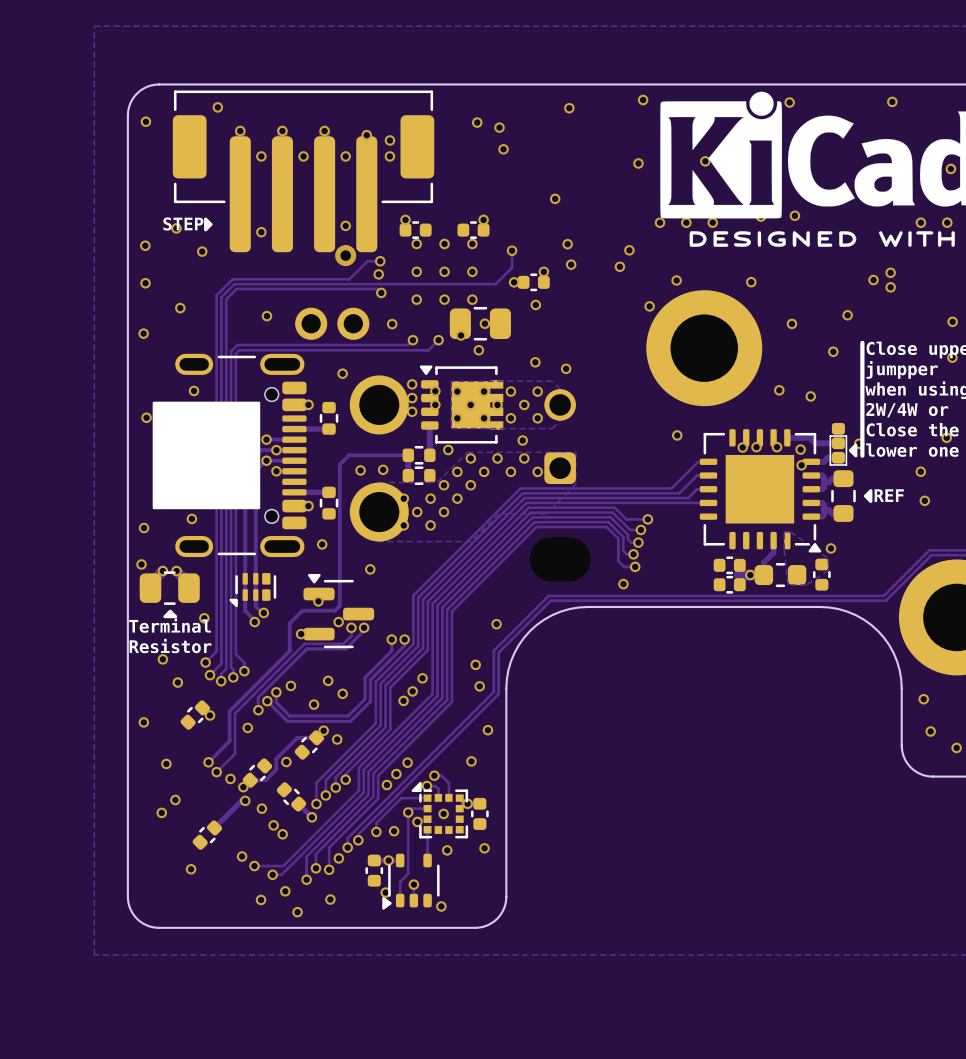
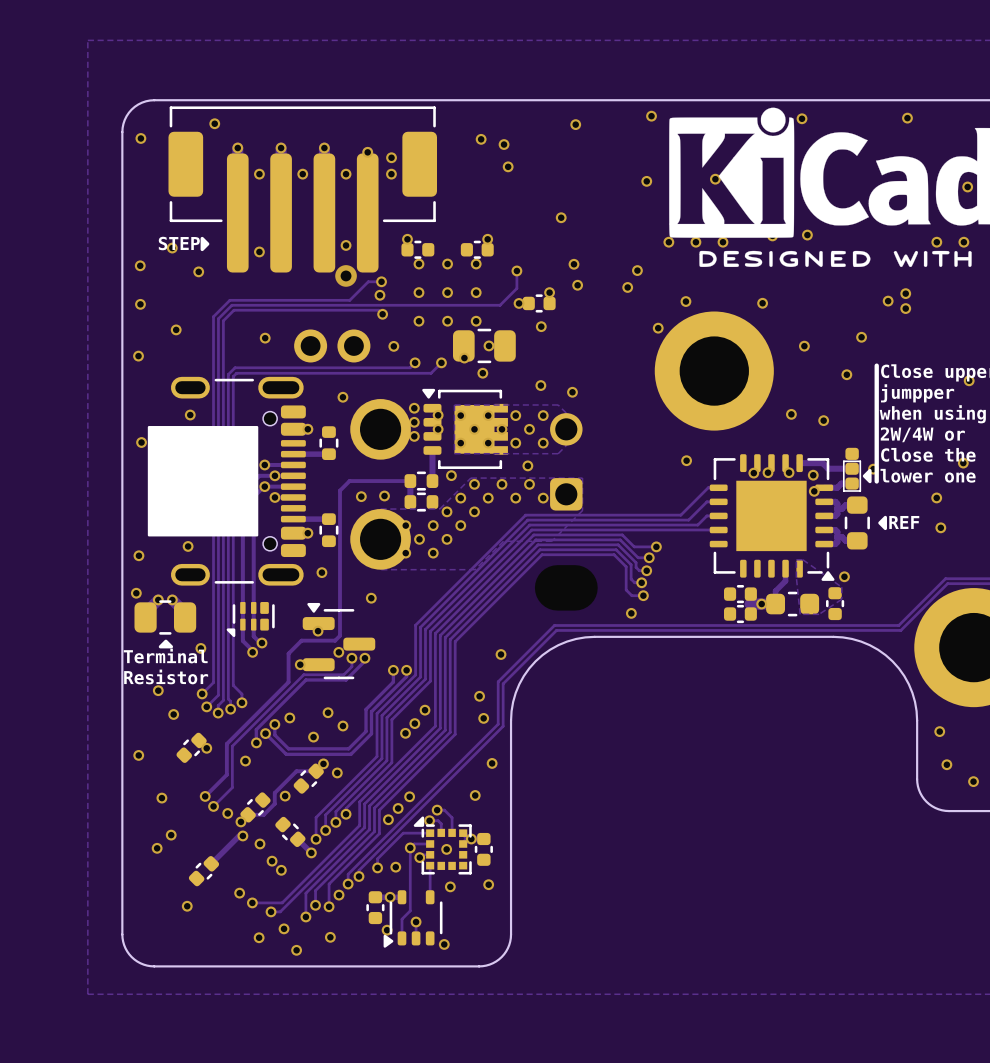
via: (952, 321) -> none

